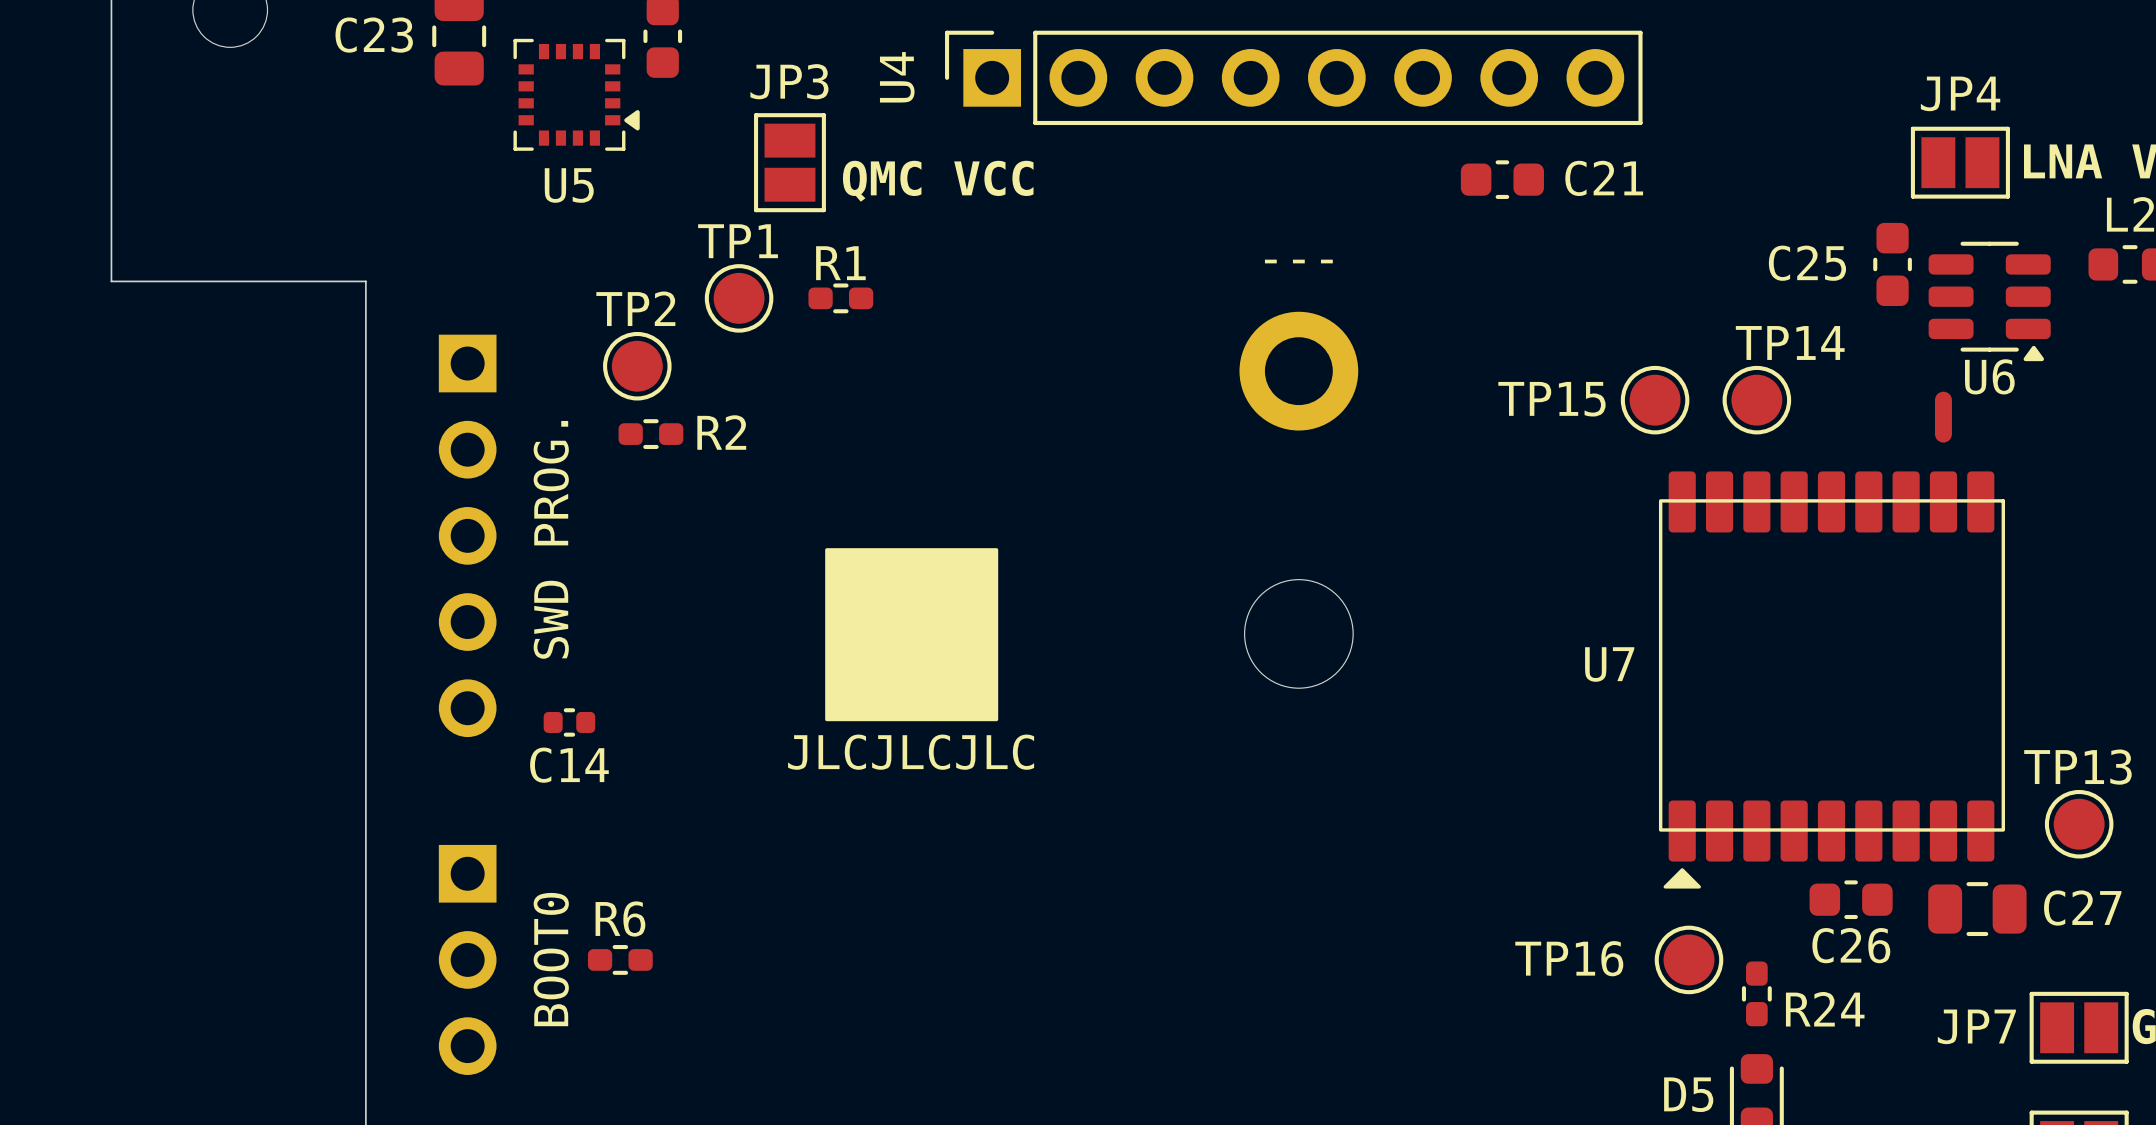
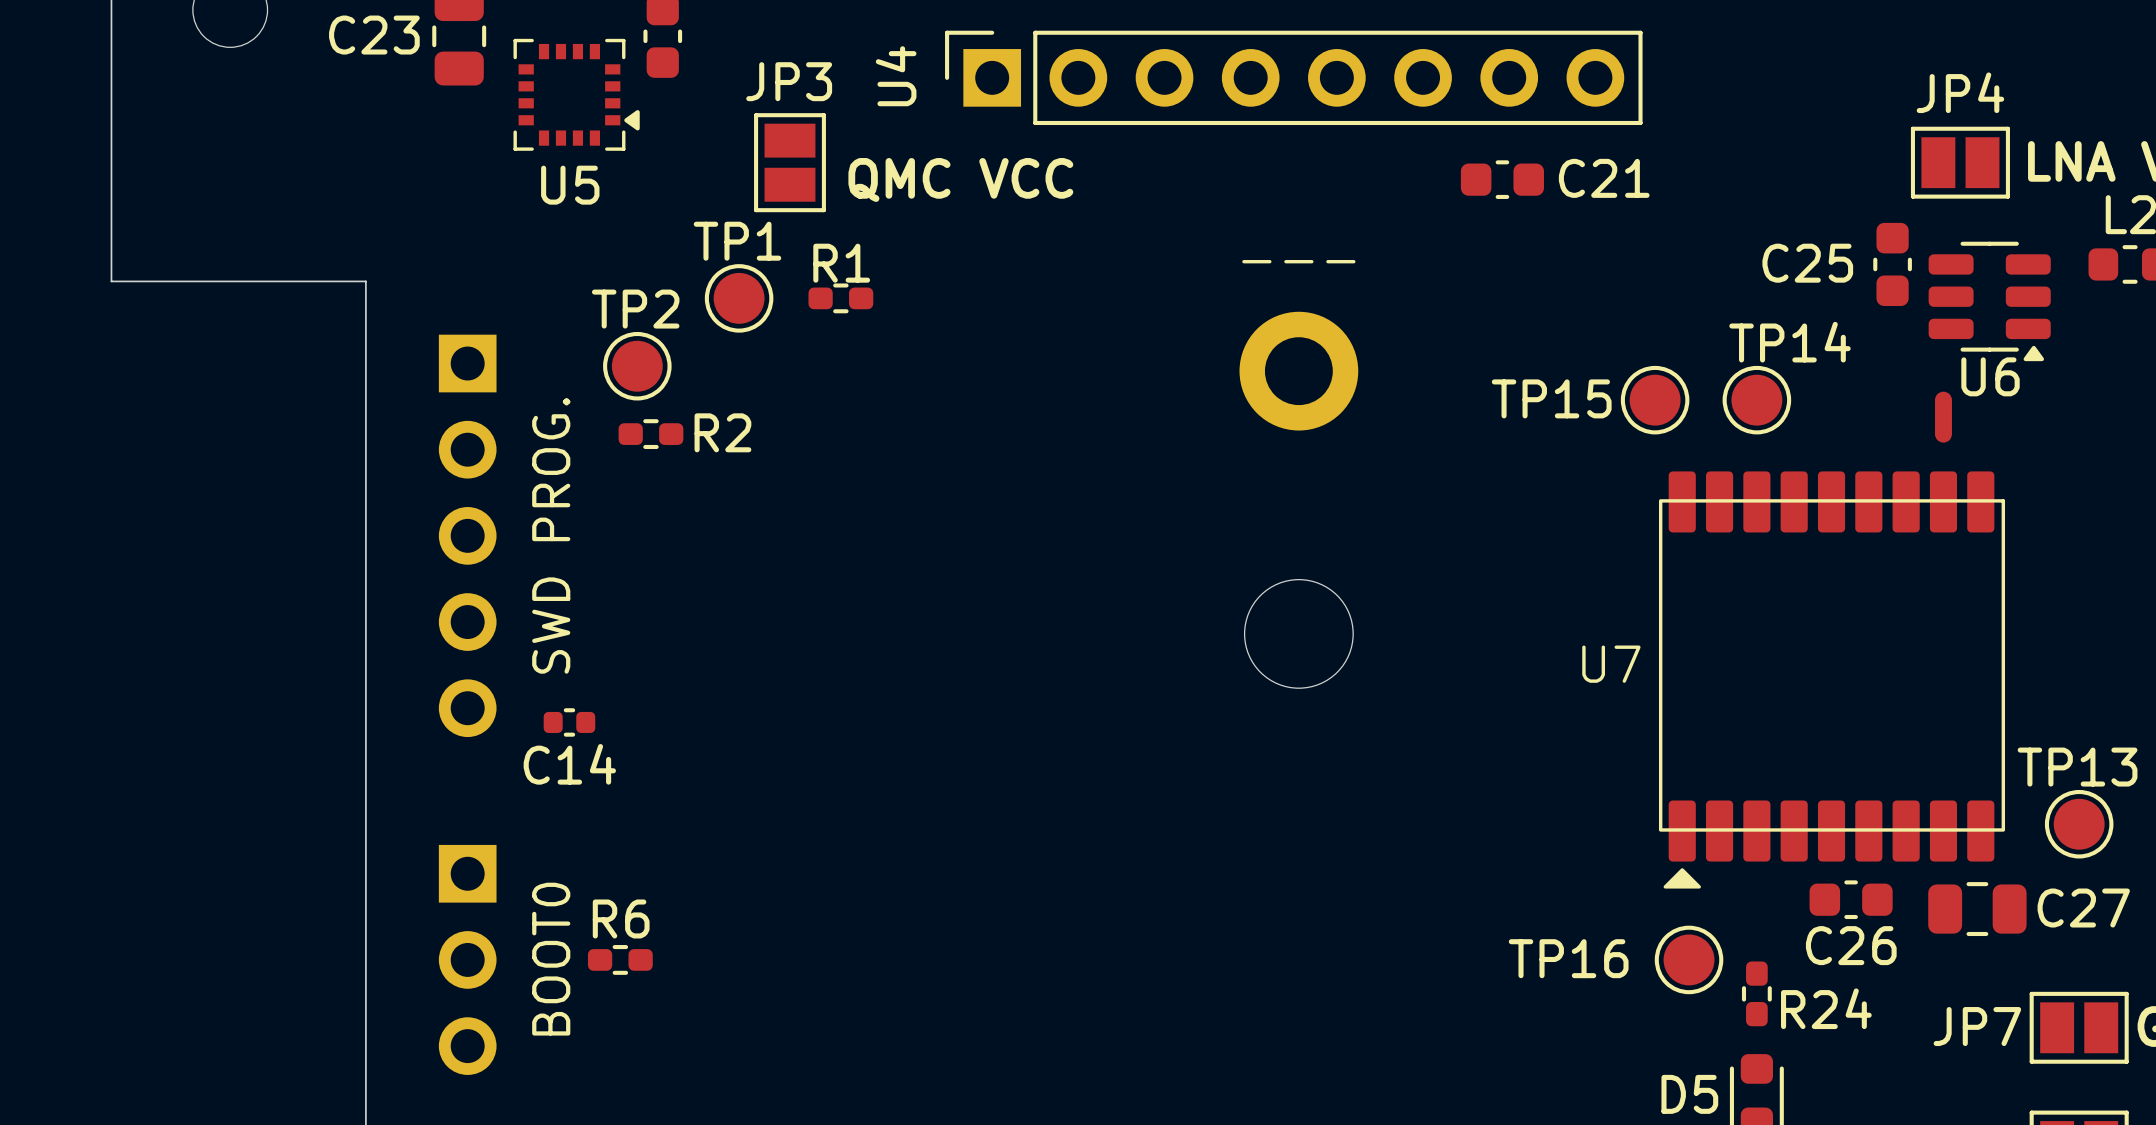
drawing: [825, 548, 999, 722] -> none
text: JLCJLCJLC (911, 752) -> none

